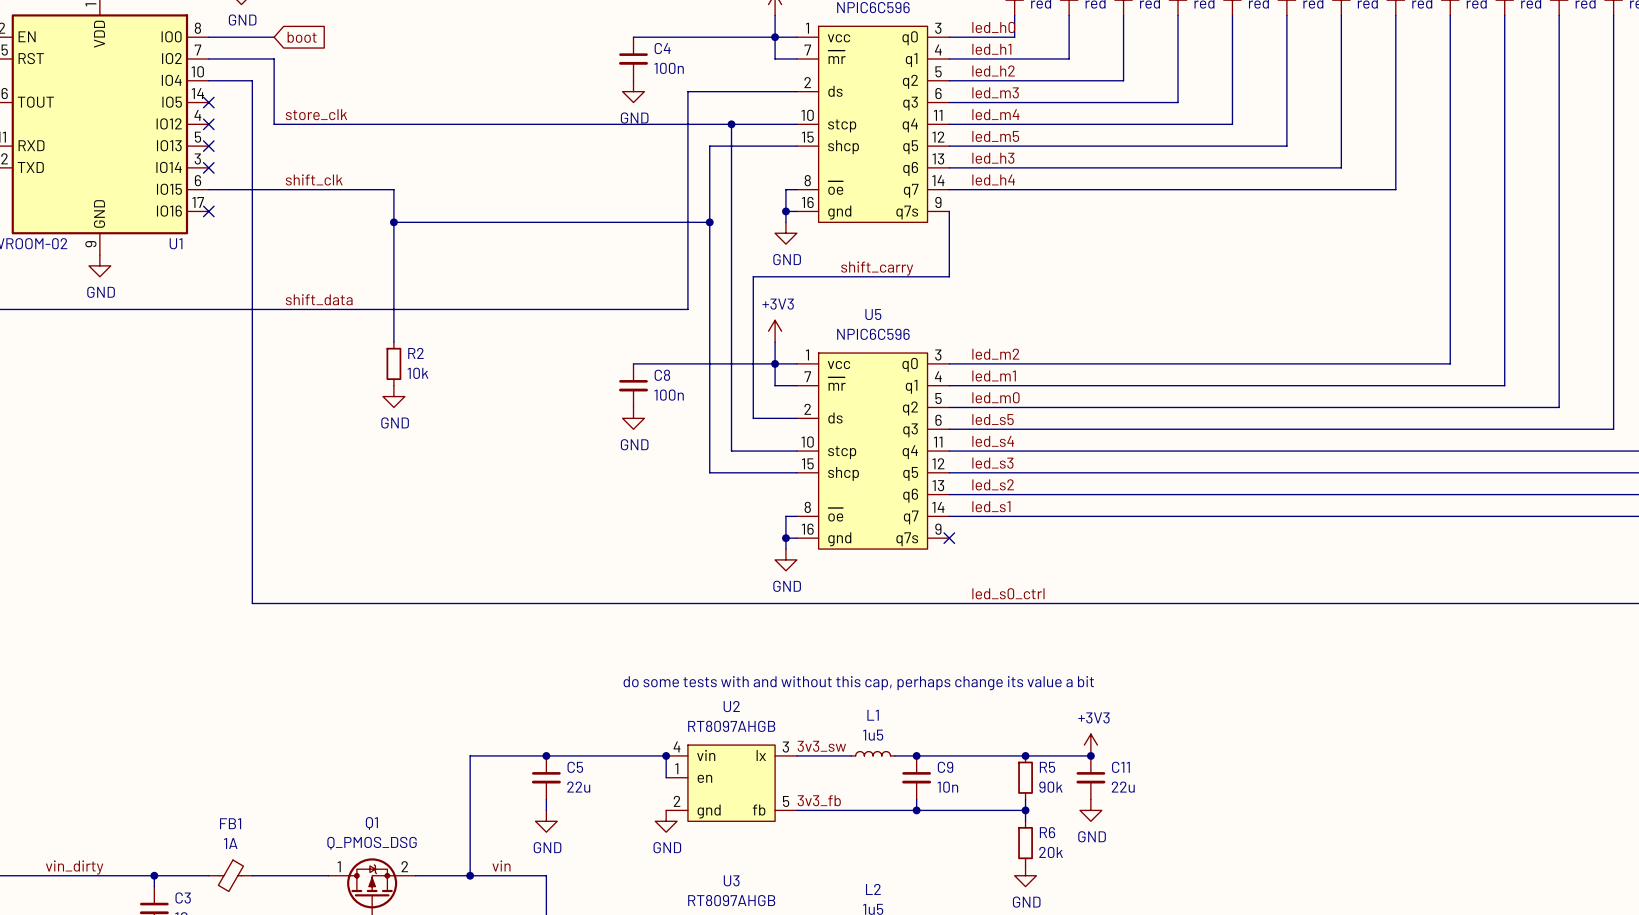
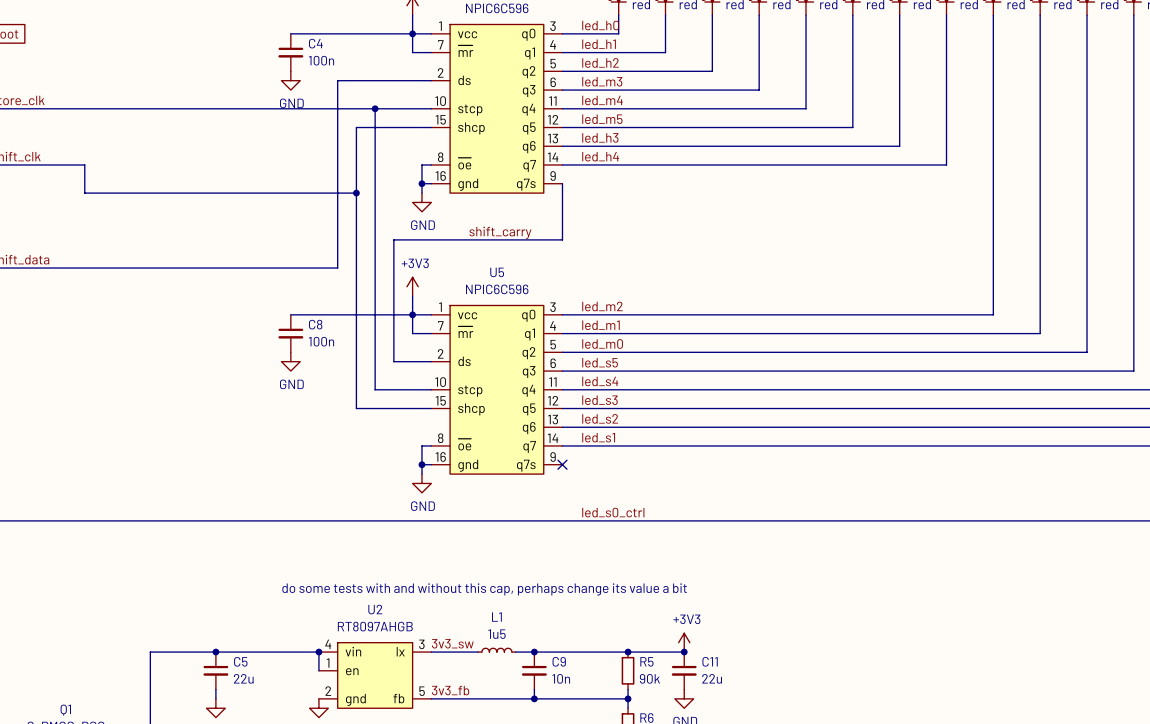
wire: (393, 222) (393, 342) -> none
junction: (393, 222) -> none
R2: 10k (393, 363) -> none
power symbol: GND (393, 396) -> none

